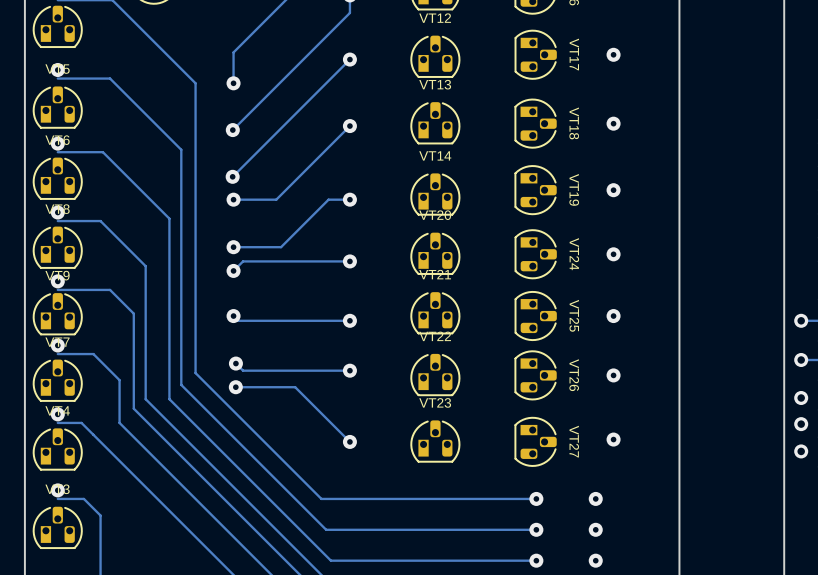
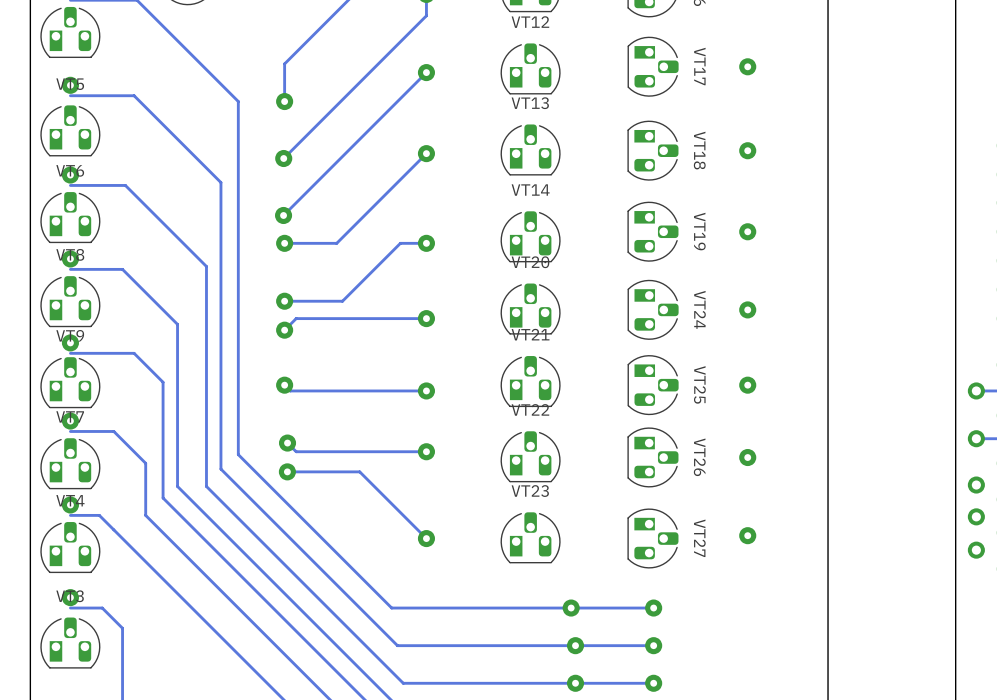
via: none -> (571, 608)
via: (595, 498) -> none
via: none -> (575, 645)
via: (595, 529) -> none
via: none -> (575, 683)
via: (595, 560) -> none

